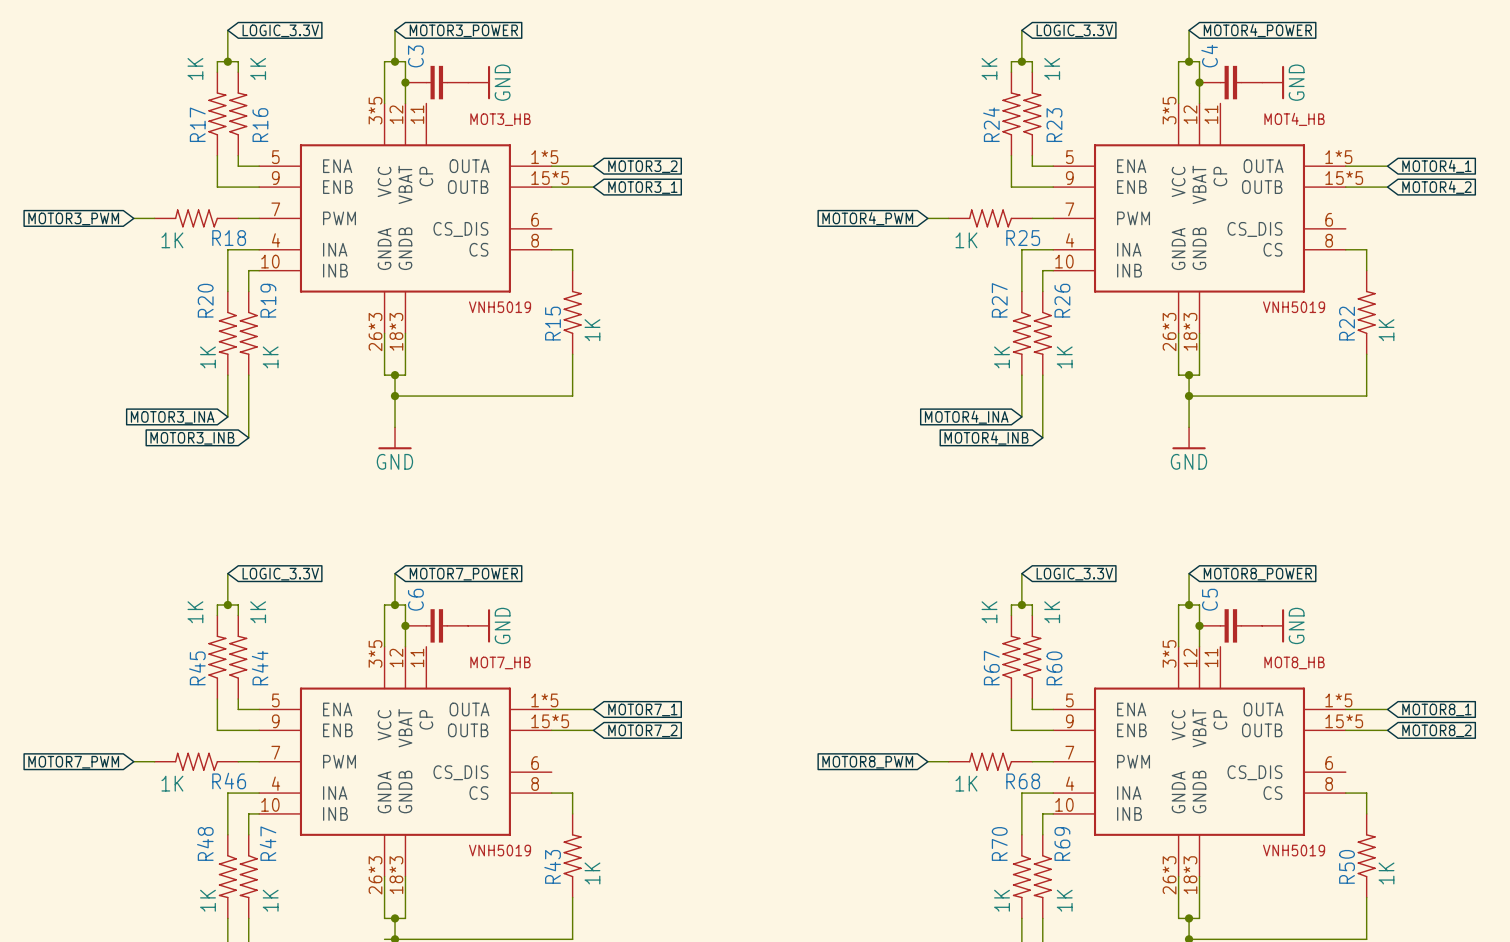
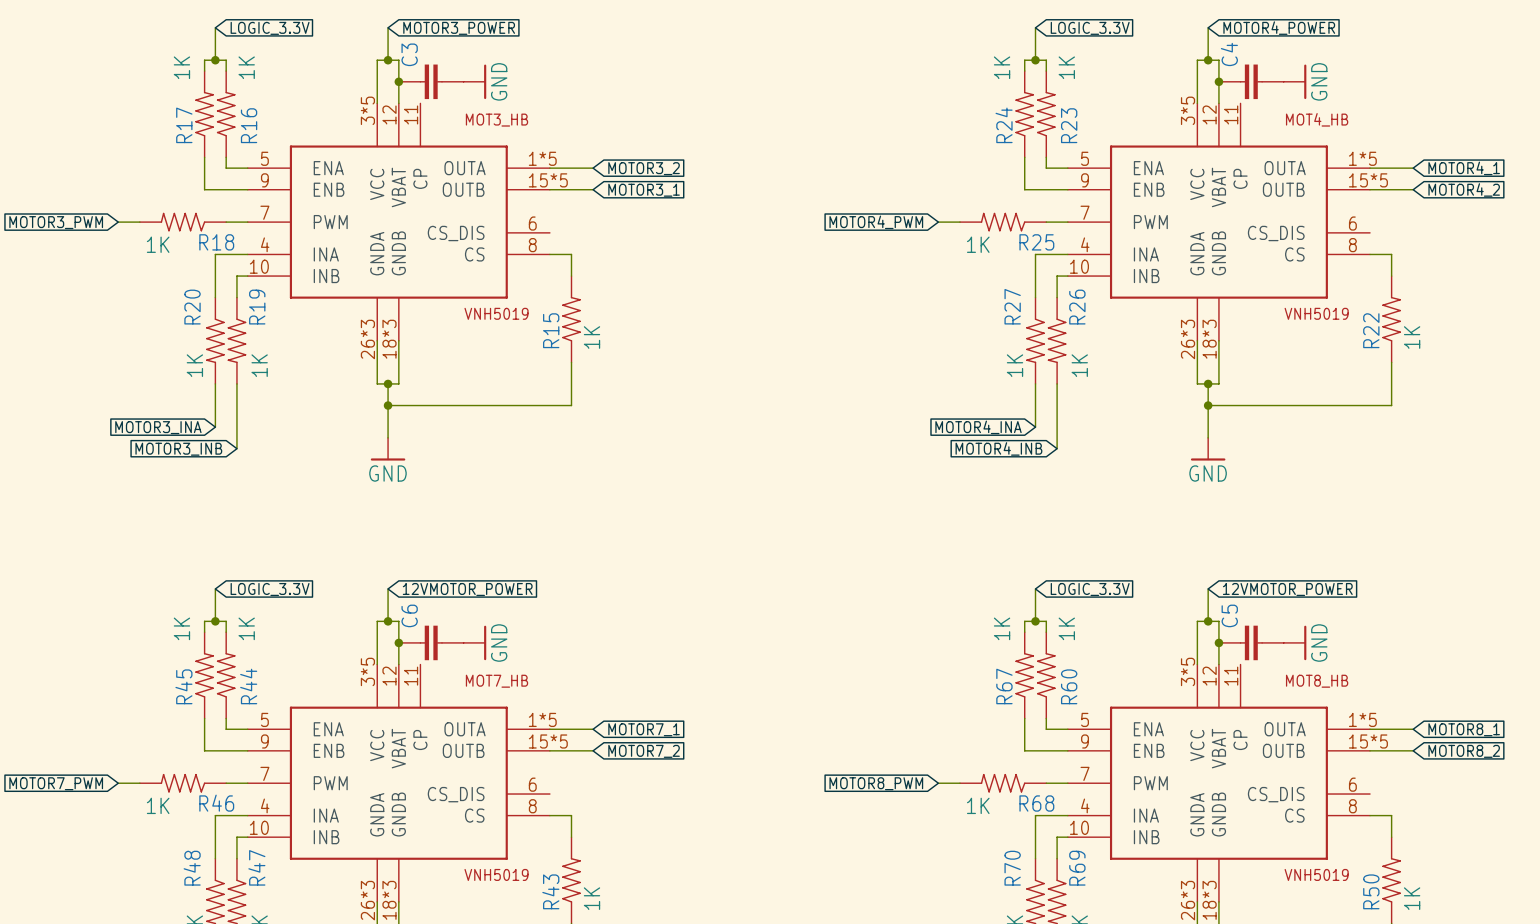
global label: MOTOR7_POWER (463, 574) -> 12VMOTOR_POWER (467, 589)
global label: MOTOR8_POWER (1257, 574) -> 12VMOTOR_POWER (1287, 589)

